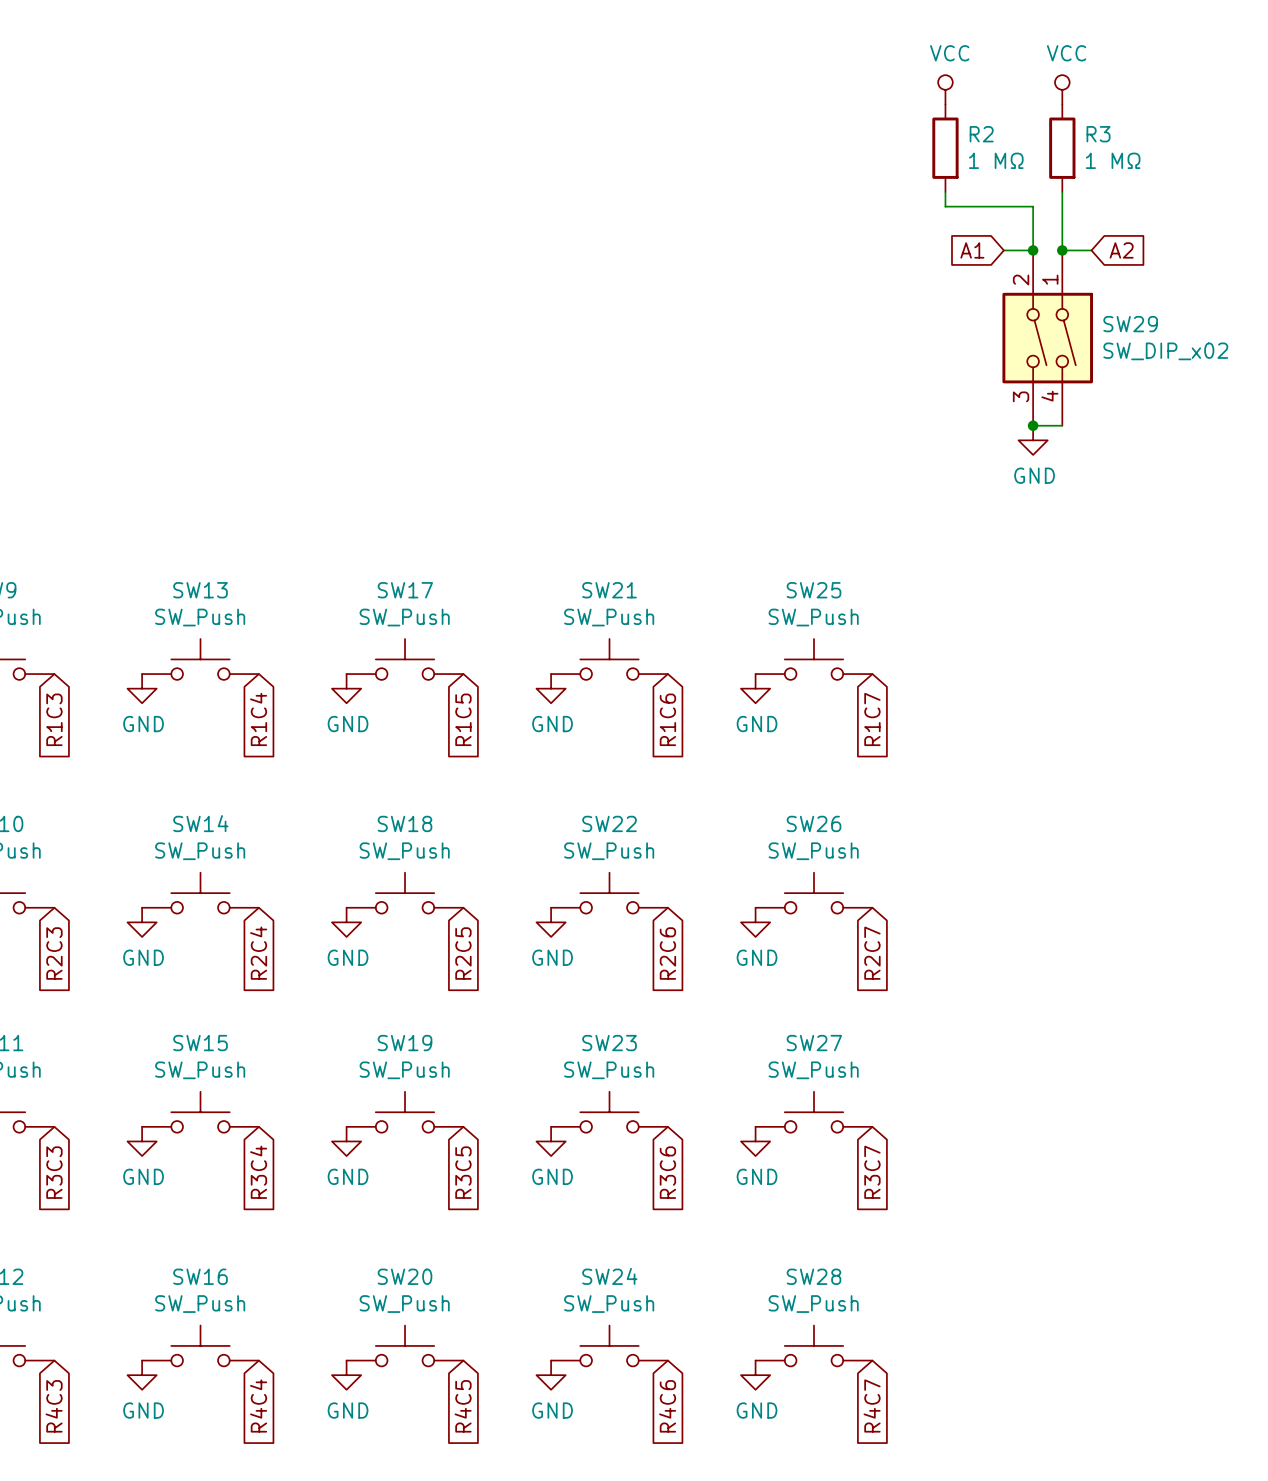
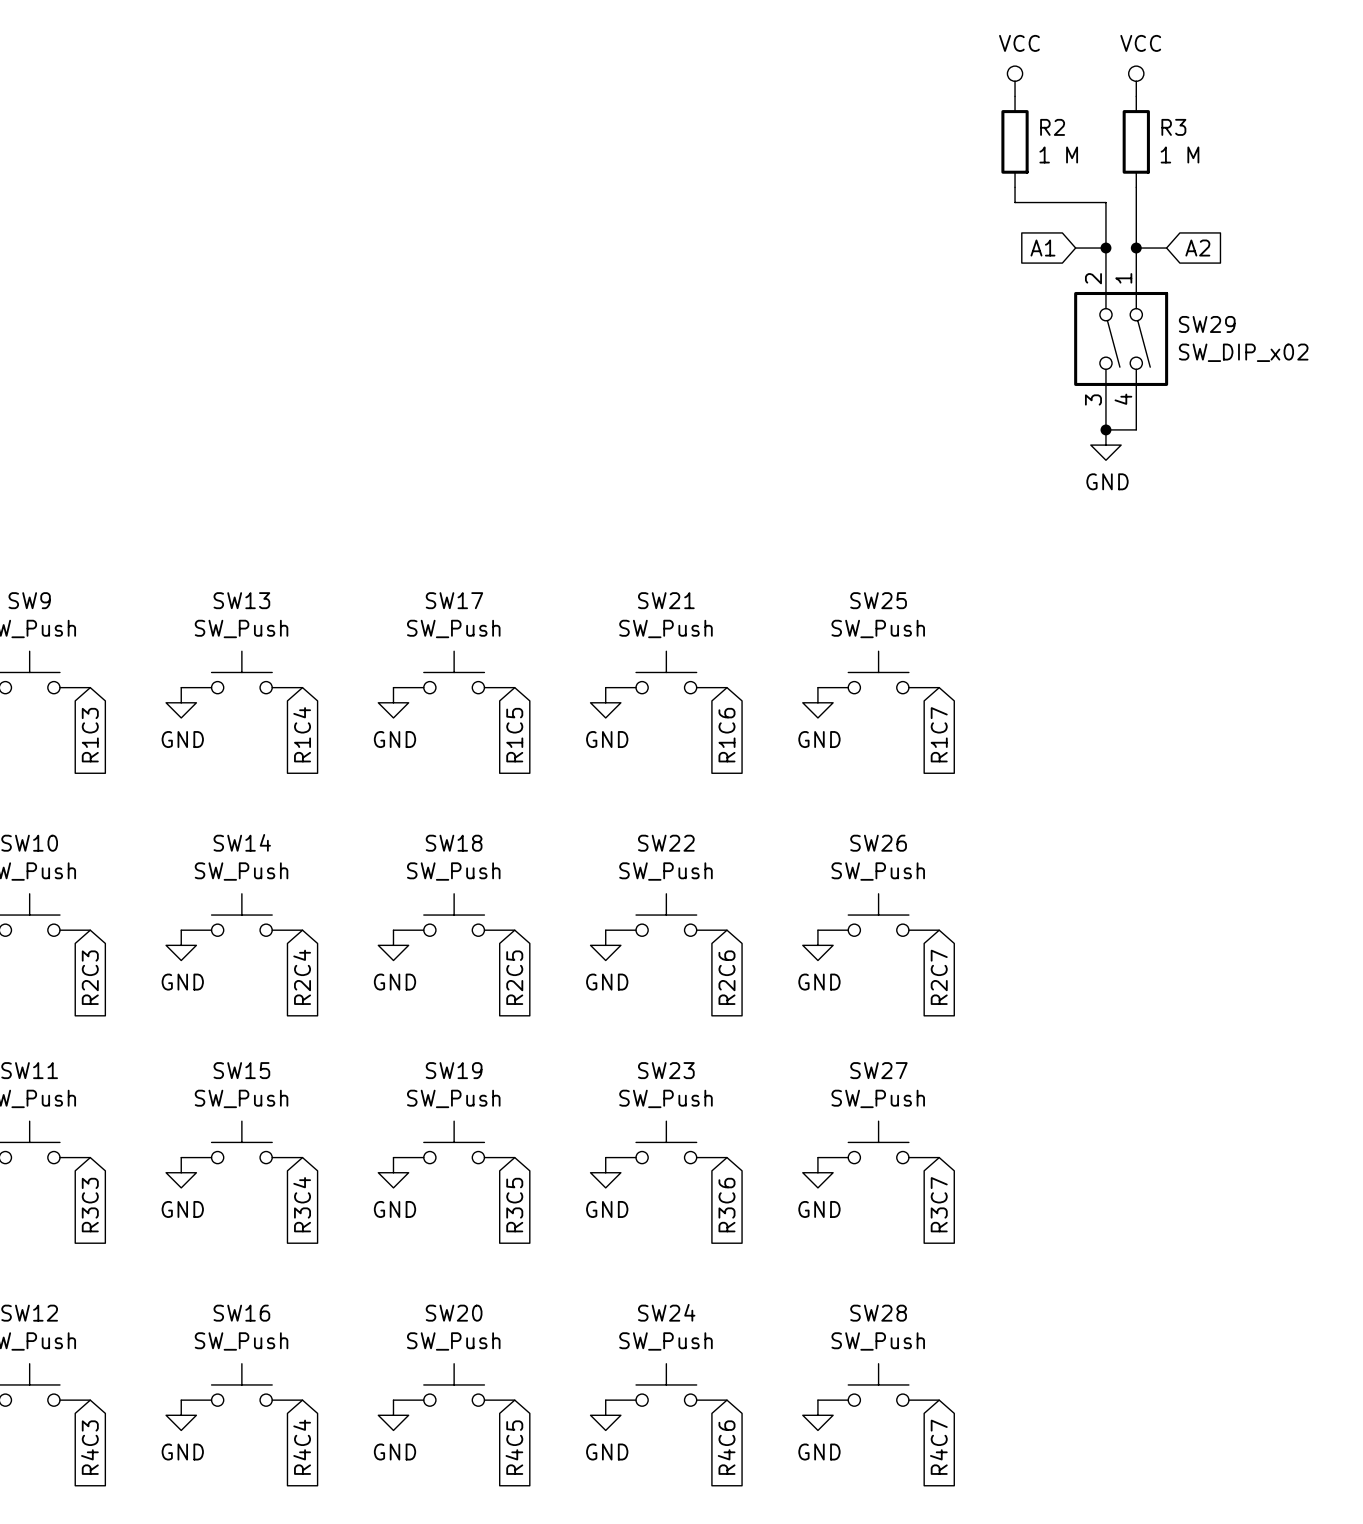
R2 value: 1 MΩ (996, 160) -> 1 M (1058, 154)
R3 value: 1 MΩ (1113, 160) -> 1 M (1180, 154)

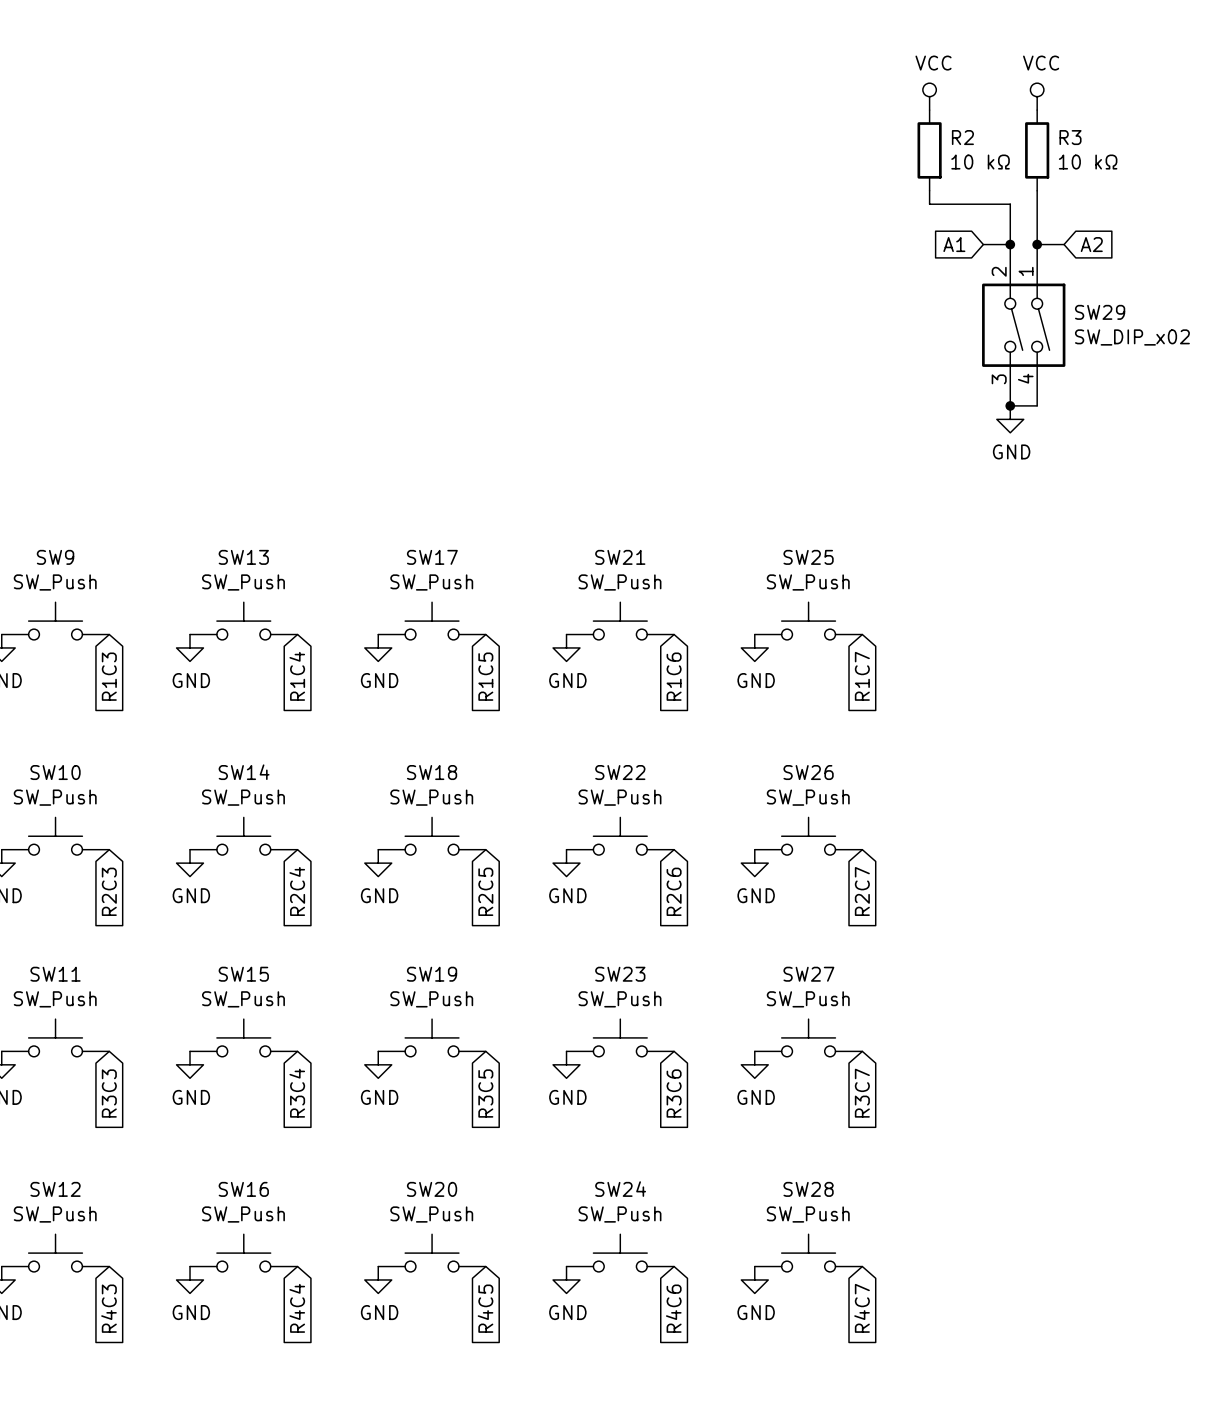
R2 value: 1 M (1058, 154) -> 10 kΩ (980, 162)
R3 value: 1 M (1180, 154) -> 10 kΩ (1088, 162)

